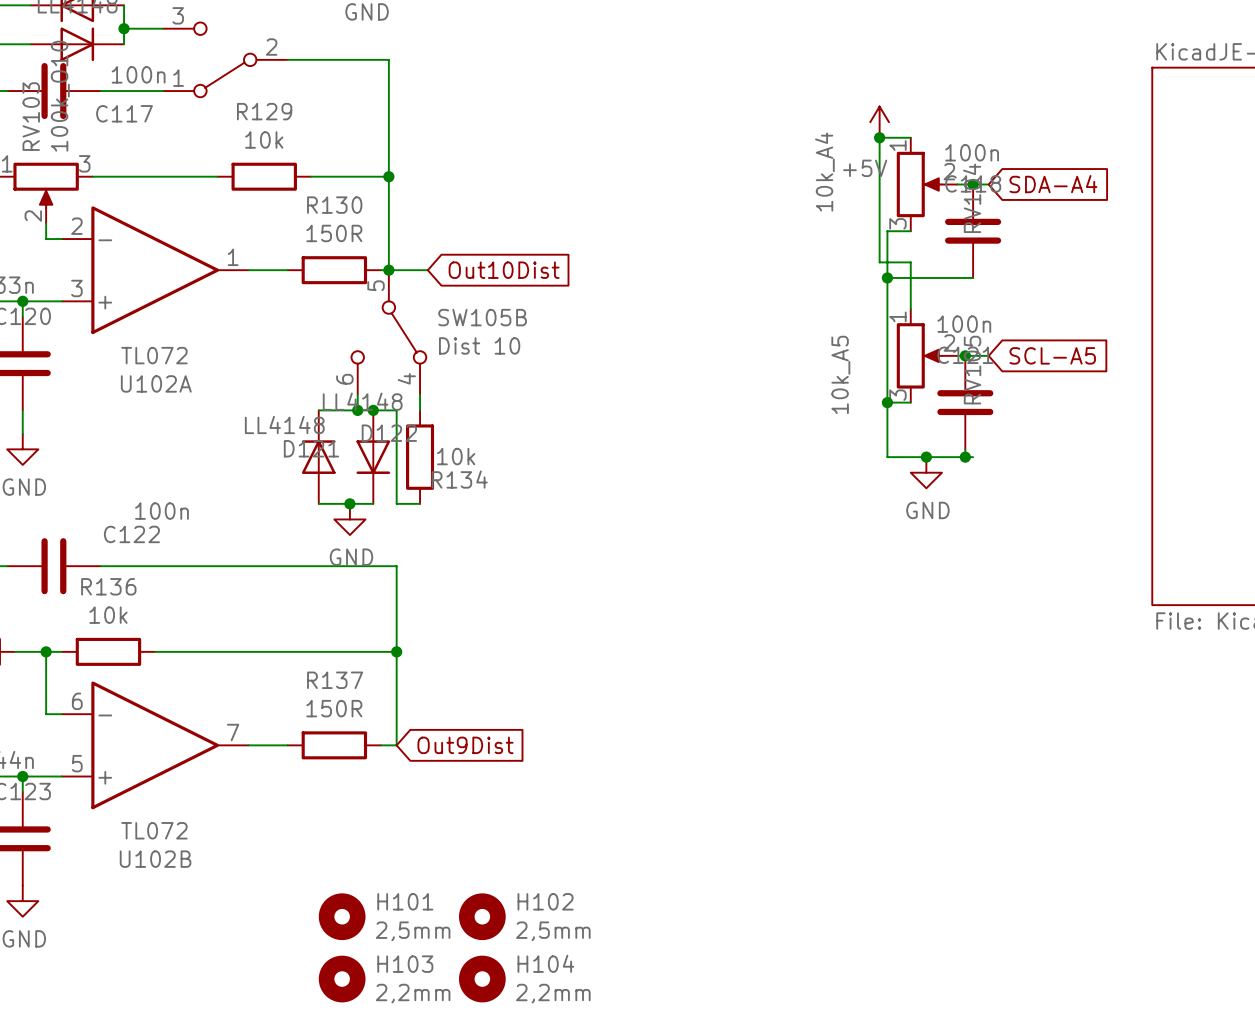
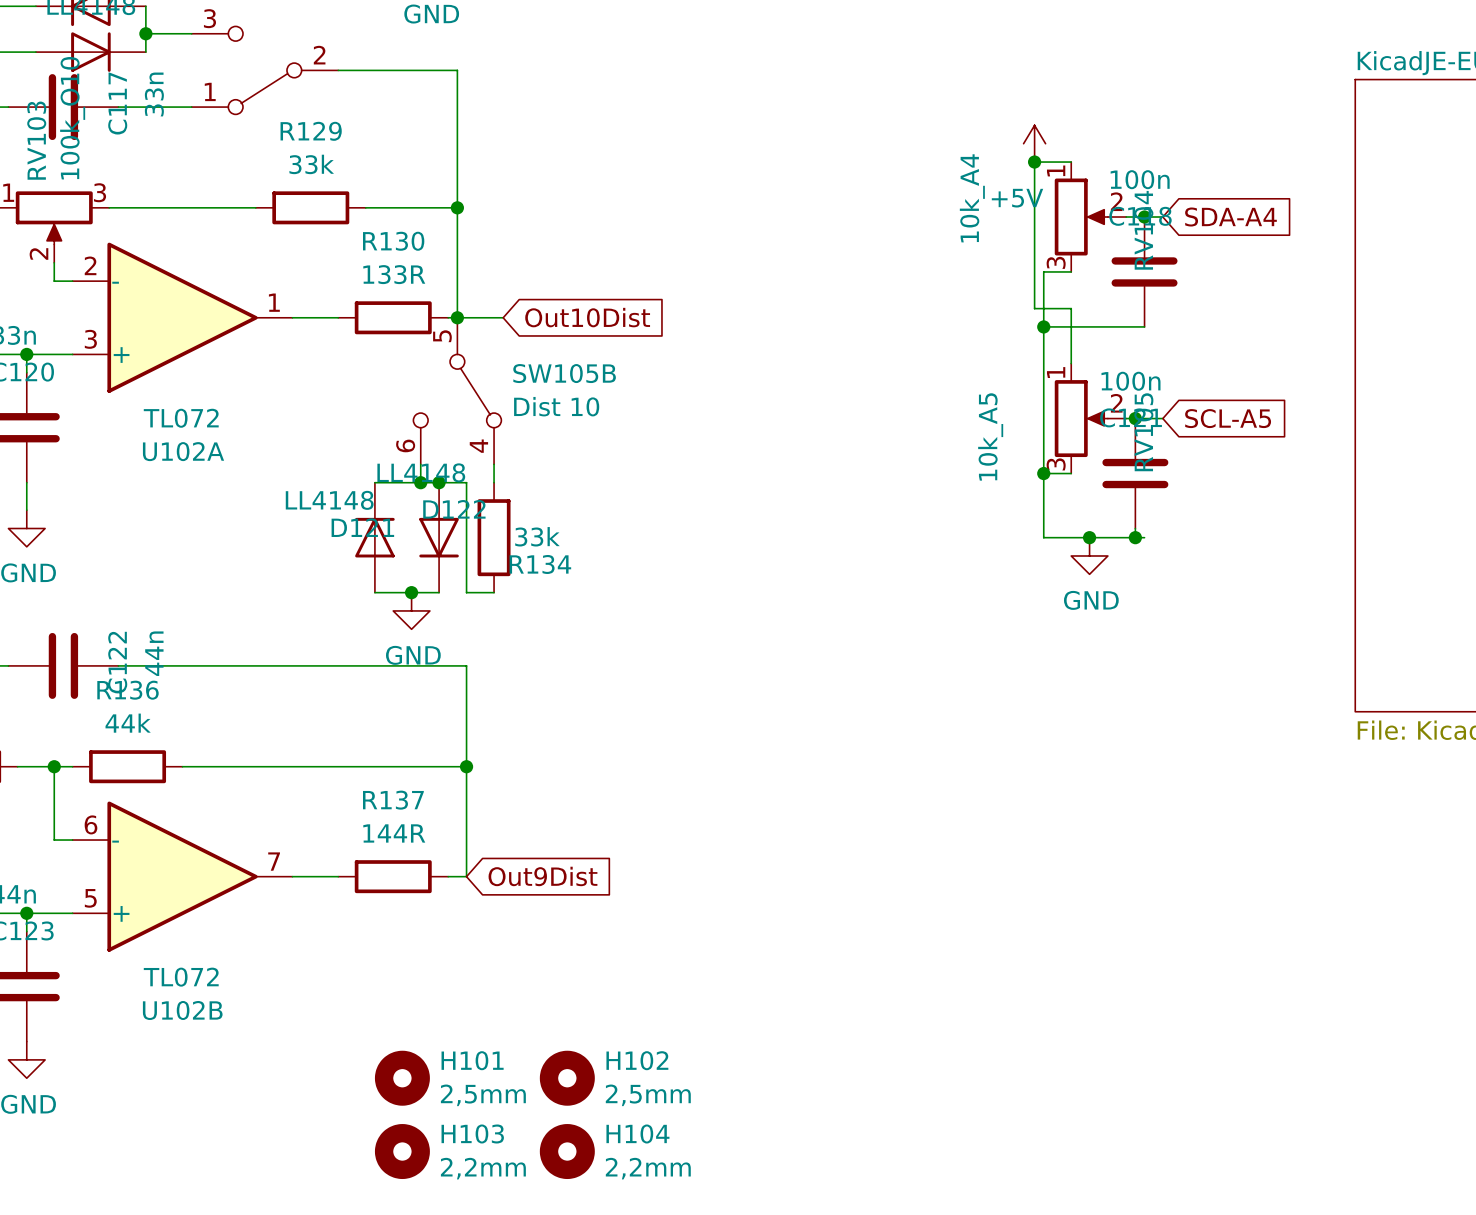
C117 value: 100n (138, 74) -> 33n (154, 94)
C117 name rotation: 0° (124, 113) -> 90° counterclockwise (117, 103)
R129 value: 10k (264, 139) -> 33k (311, 164)
R130 value: 150R (334, 233) -> 133R (394, 274)
R134 value: 10k (456, 456) -> 33k (537, 536)
C122 value: 100n (161, 511) -> 44n (154, 653)
C122 name rotation: 0° (131, 534) -> 90° counterclockwise (117, 662)
R136 value: 10k (108, 615) -> 44k (128, 723)
R137 value: 150R (334, 708) -> 144R (394, 833)

